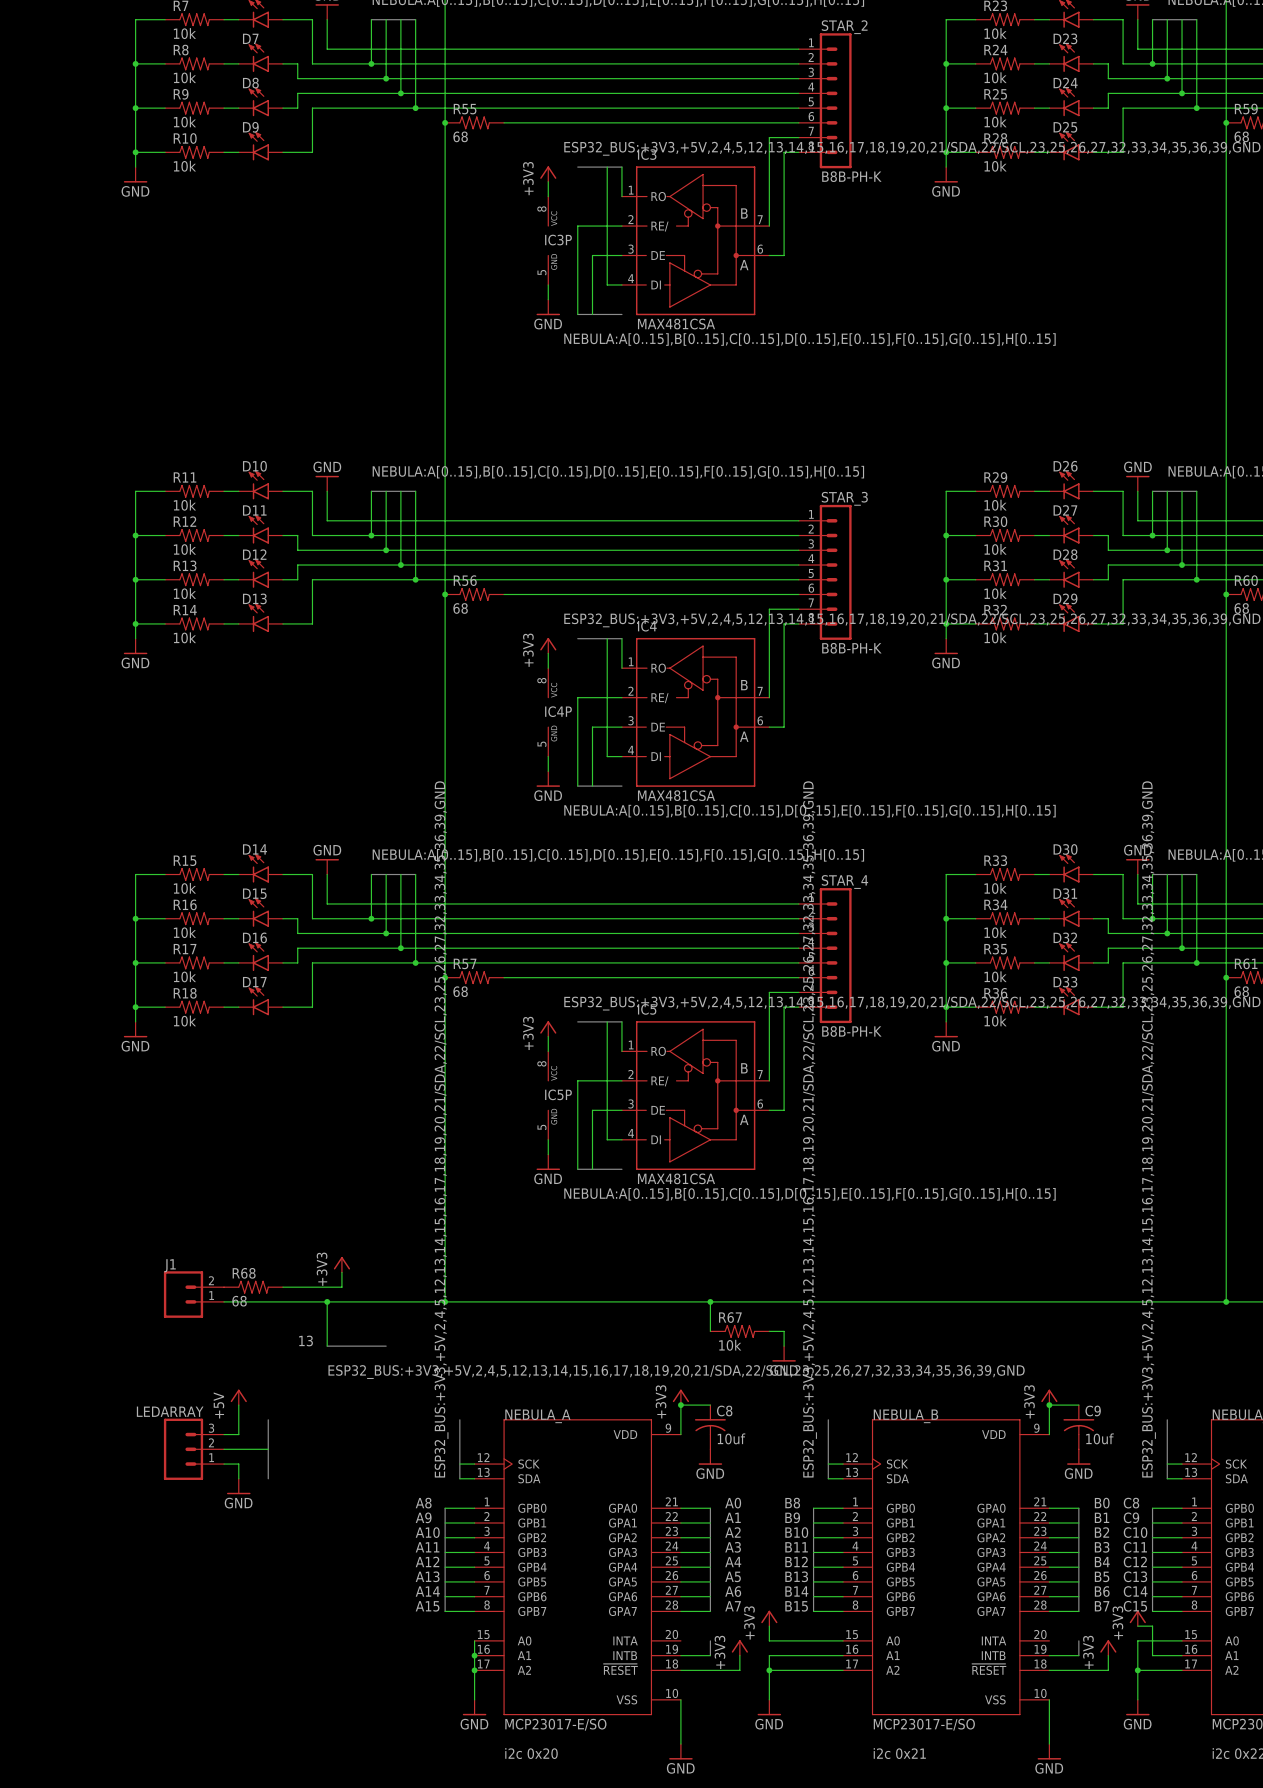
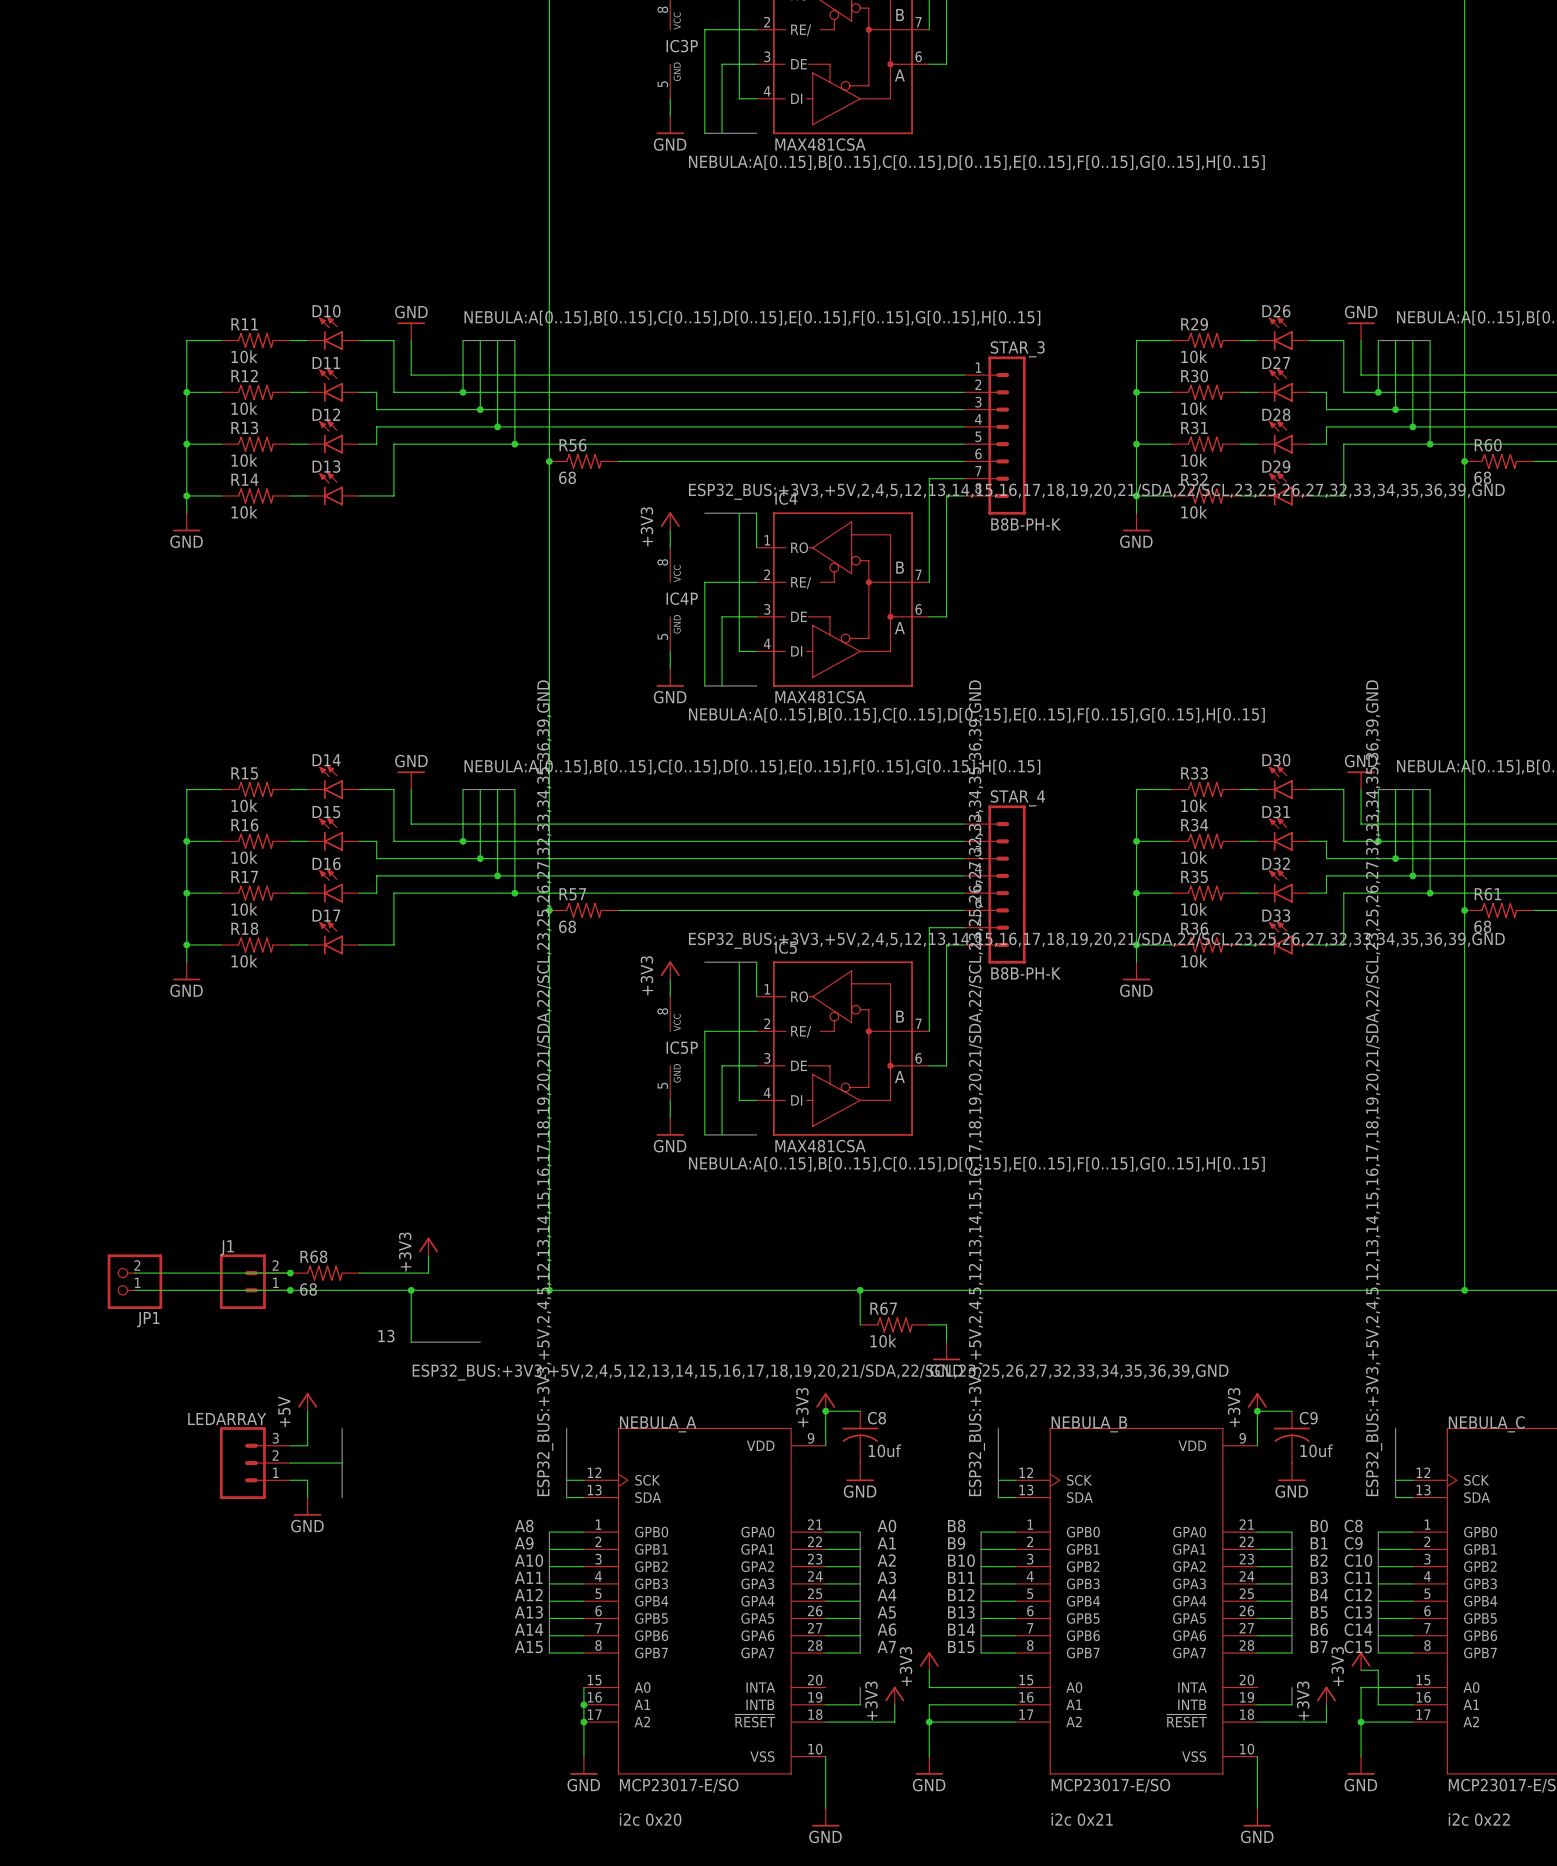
wire: none -> (134, 1273) (290, 1273)
junction: none -> (290, 1273)
JP1: none -> (134, 1281)
wire: none -> (134, 1290) (290, 1290)
junction: none -> (290, 1290)

